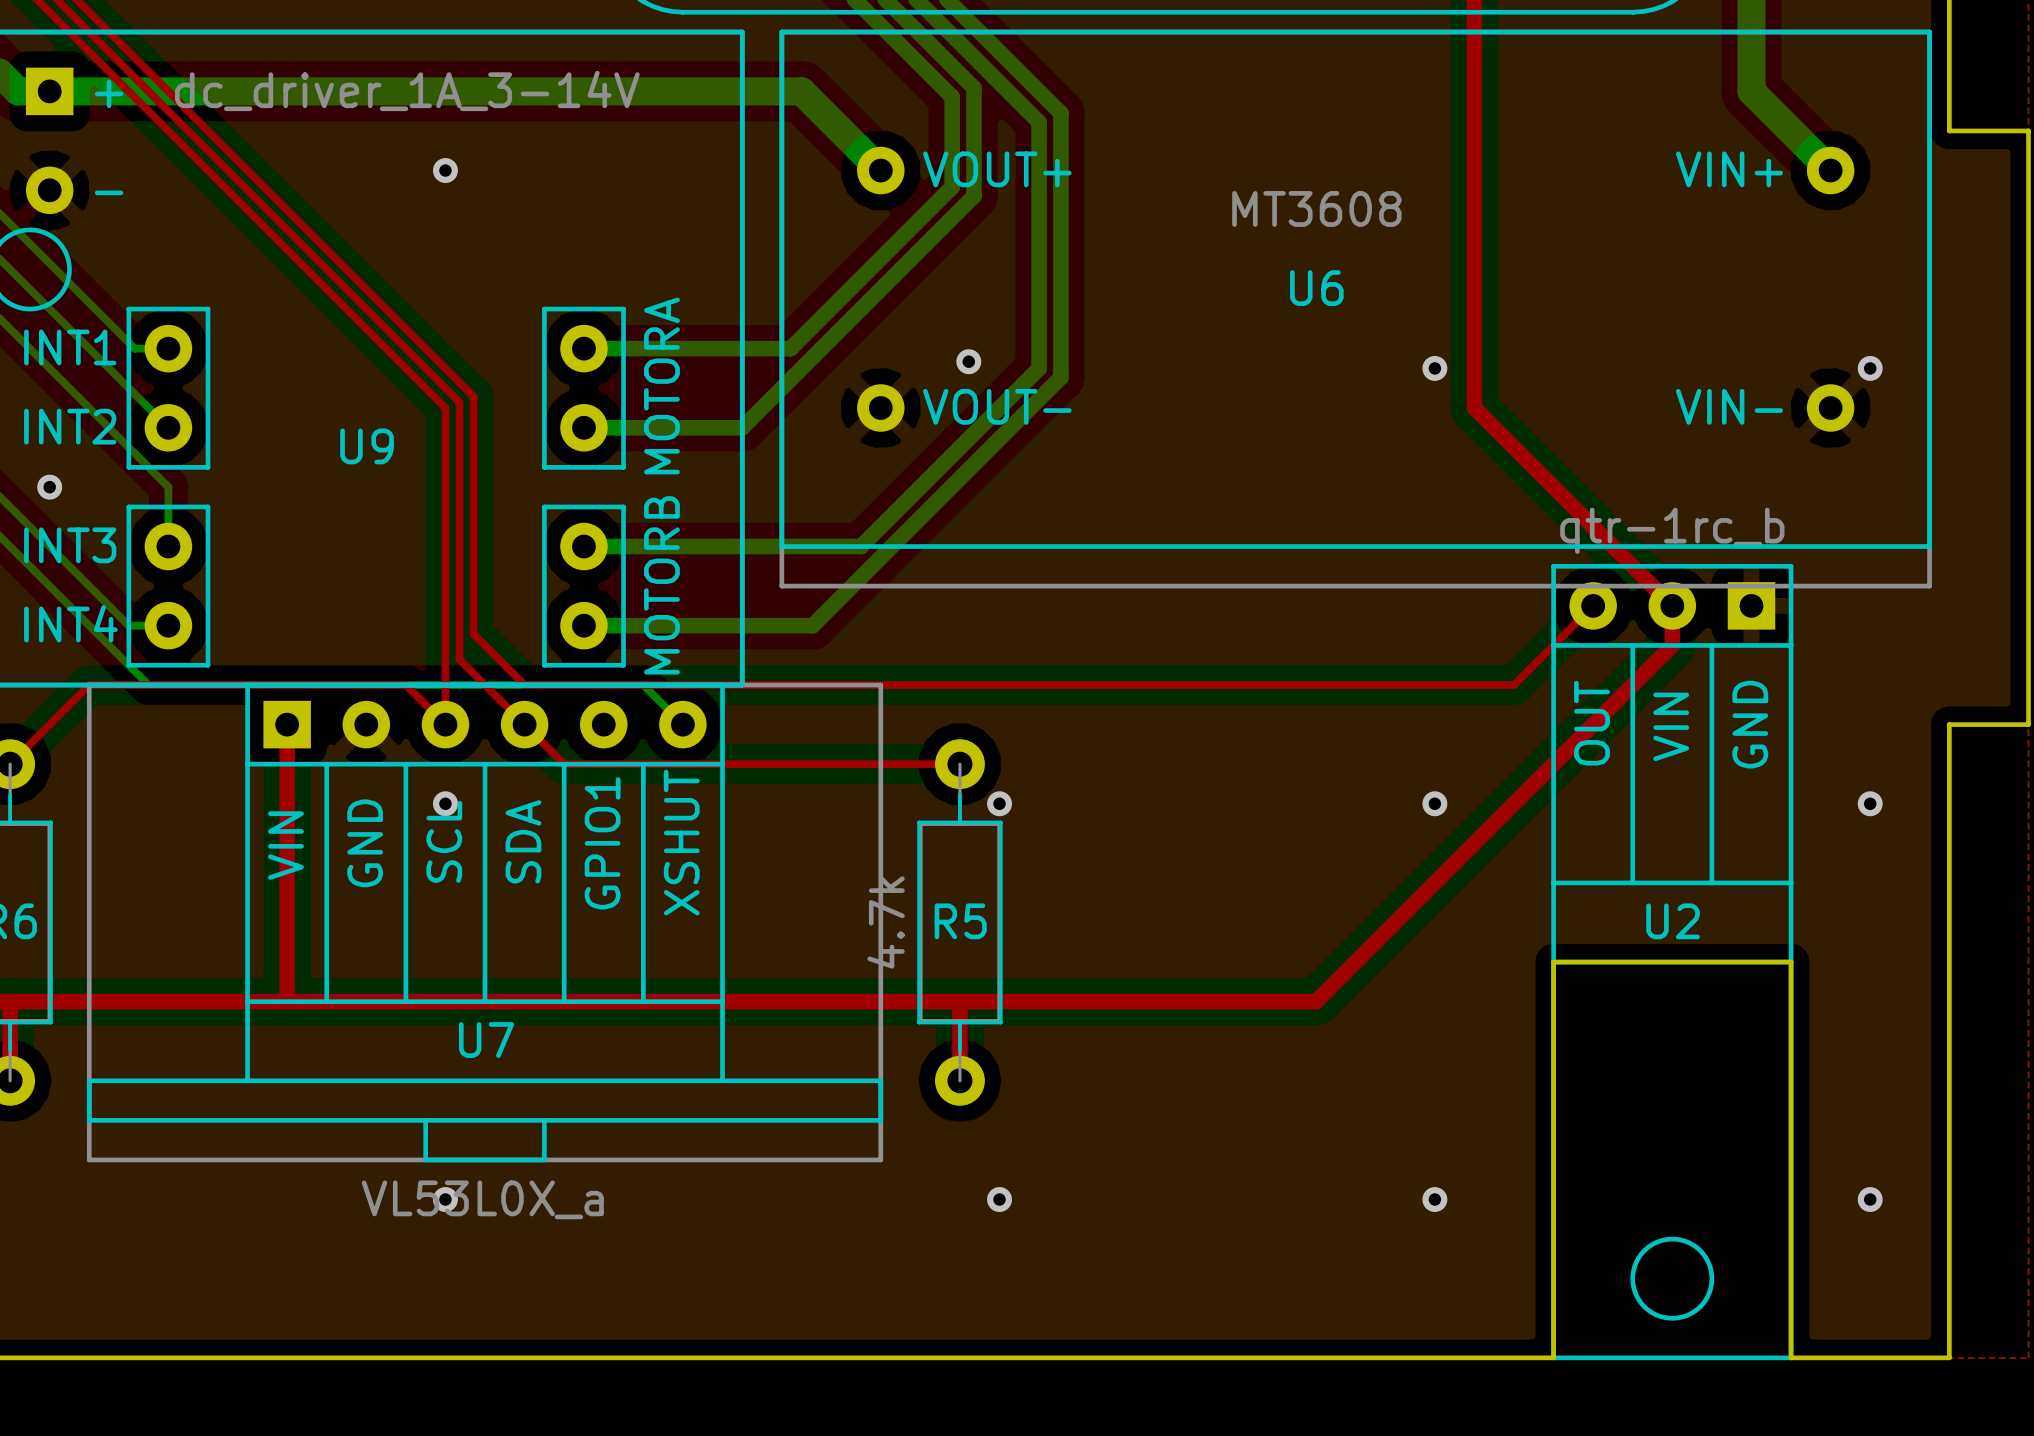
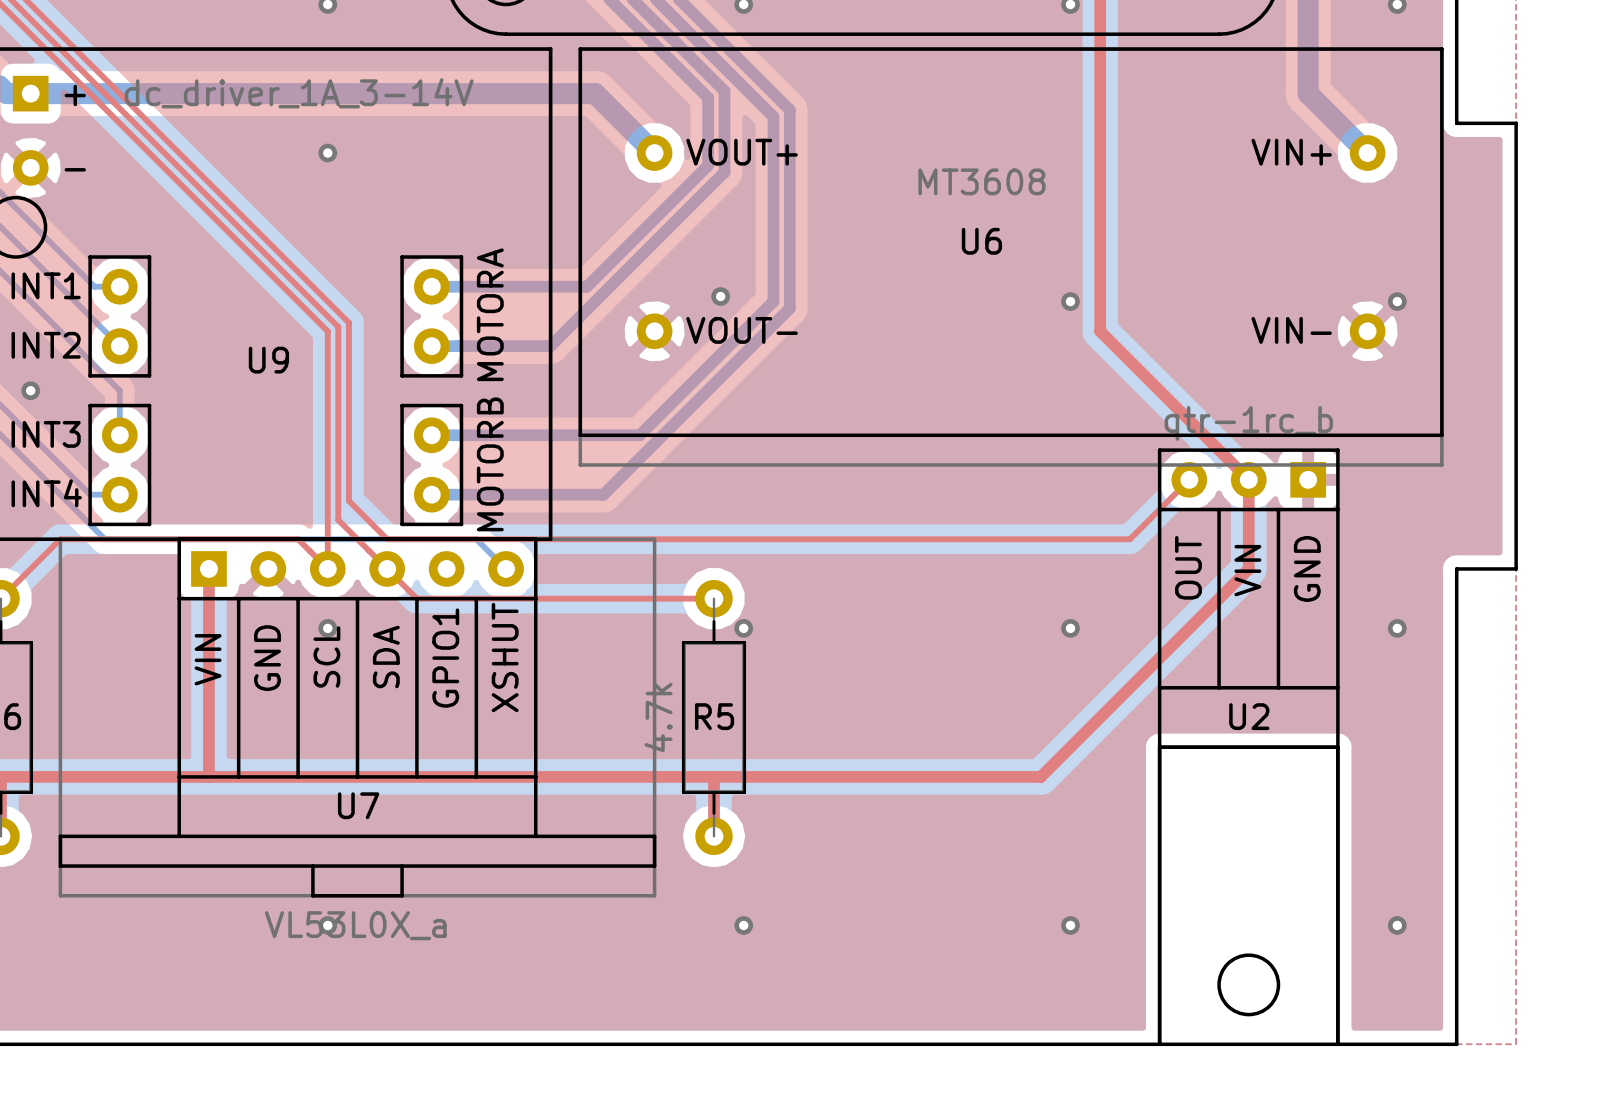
top track: (1672, 645) (1316, 1001) -> (1248, 509) (1248, 568) (1040, 776) (981, 776)

